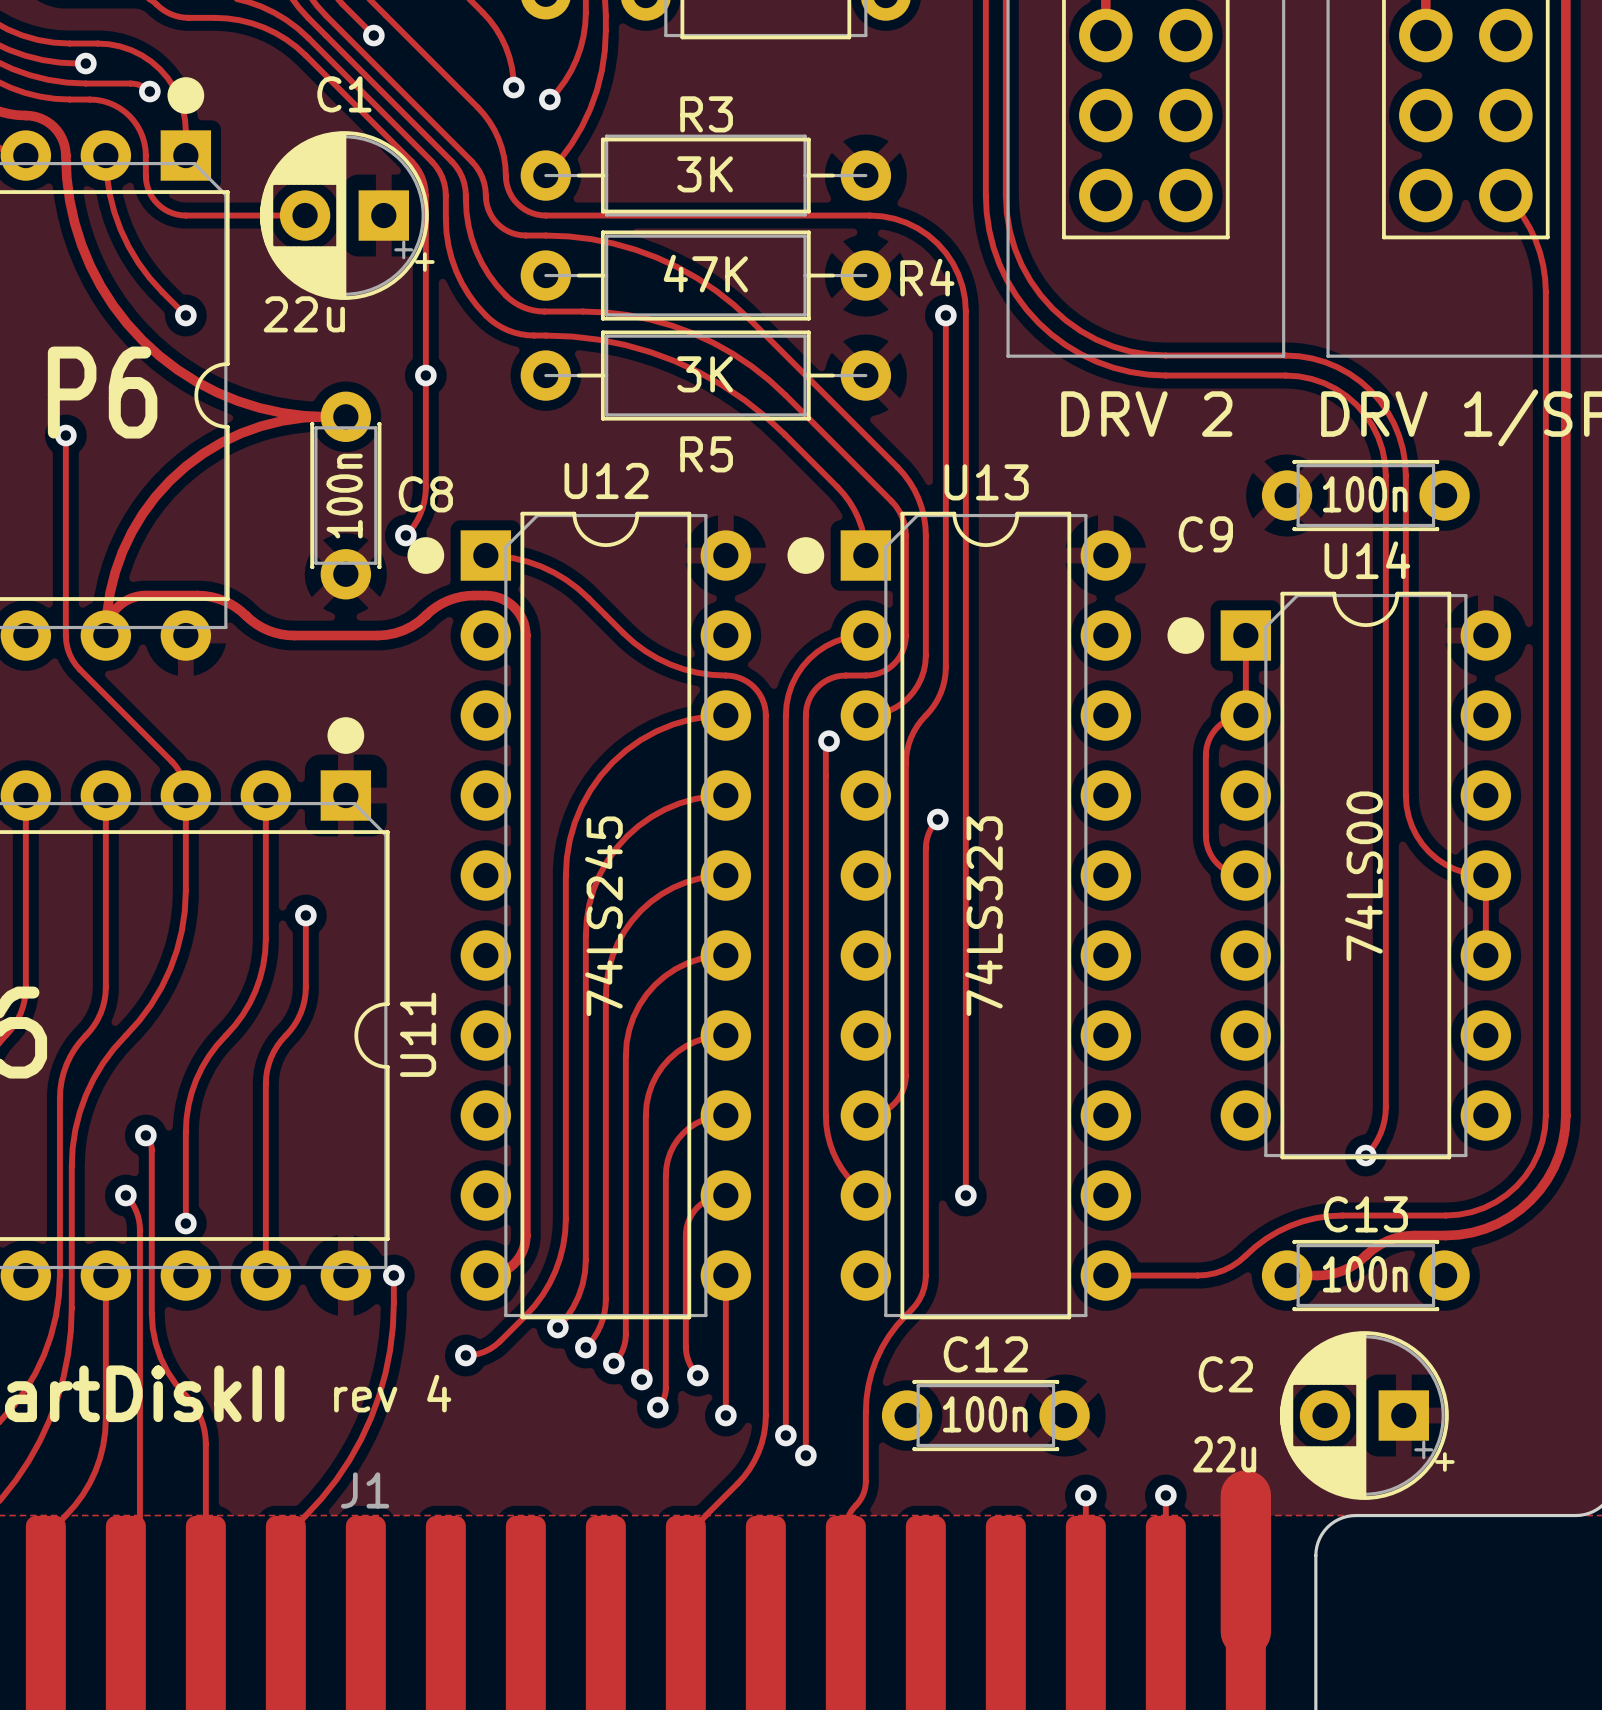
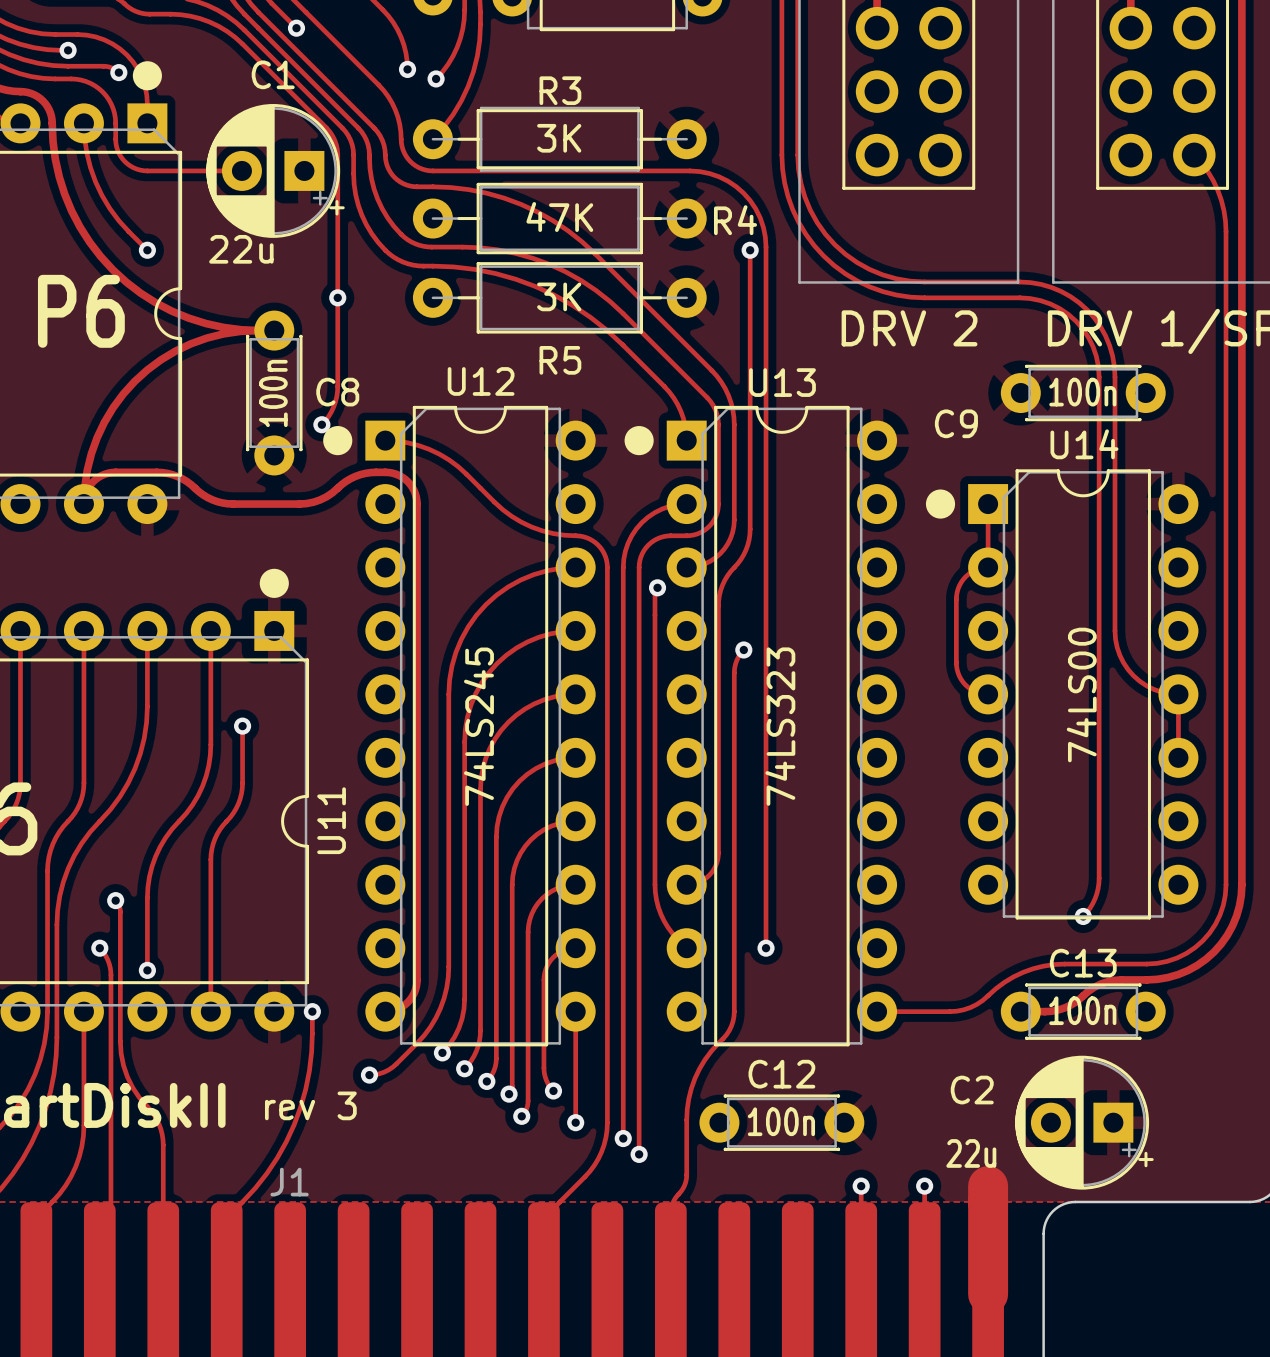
track: (65, 435) (65, 635) (67, 648) (72, 659) (79, 669) (175, 766) (182, 777) (185, 795) -> none
via: (65, 435) -> none
text: rev 4 (392, 1393) -> rev 3 (310, 1105)

